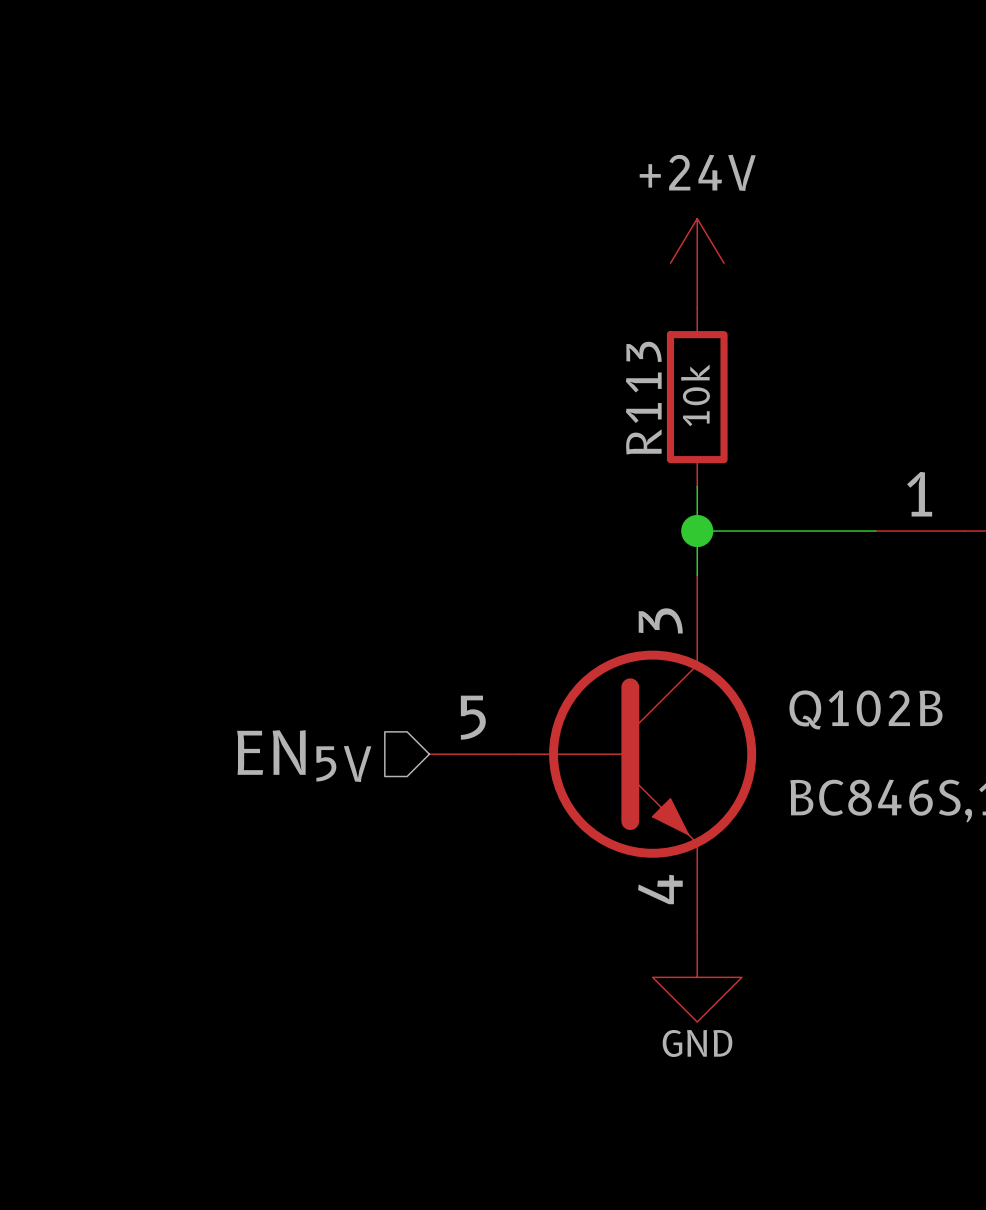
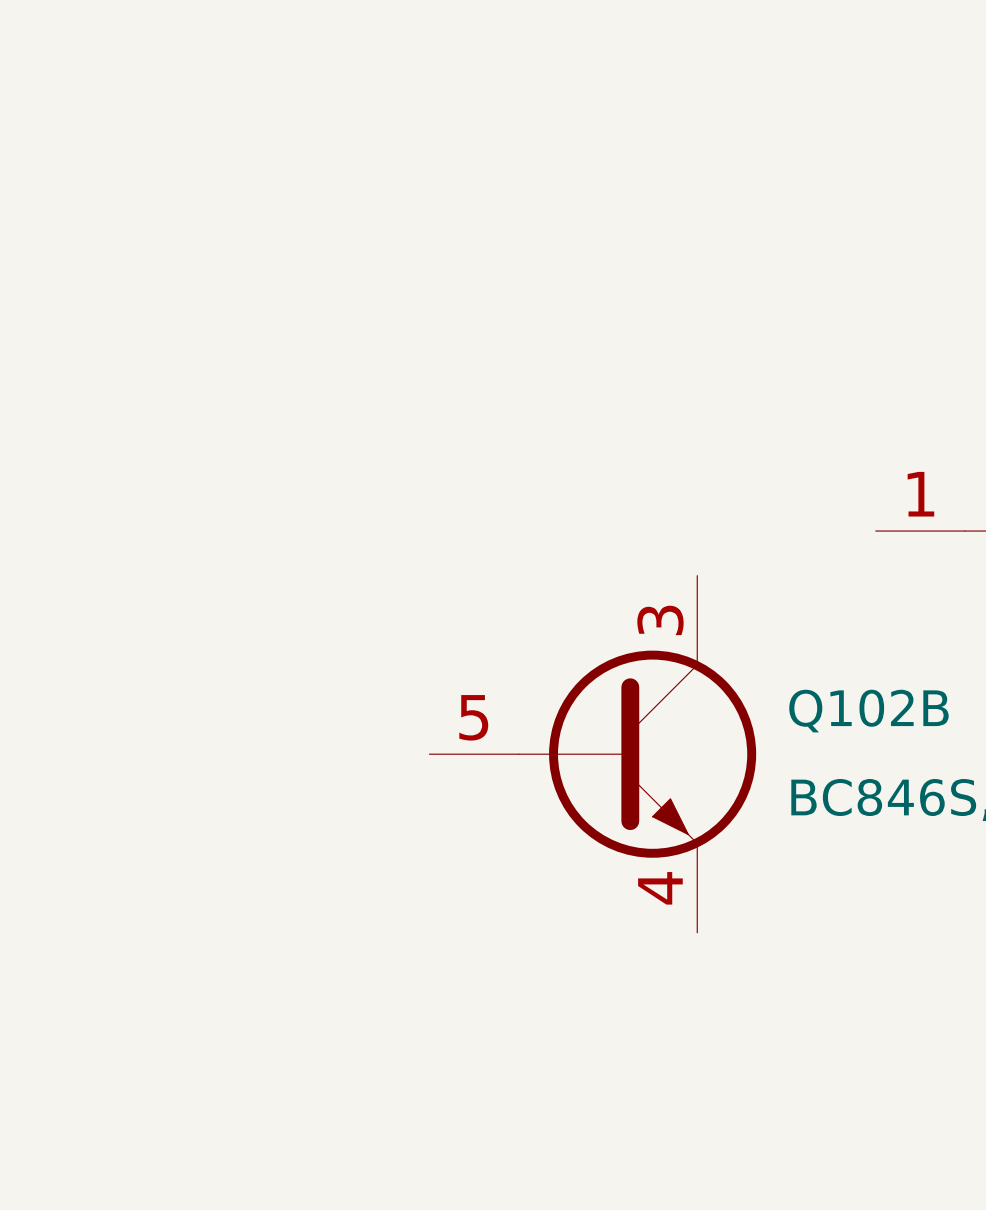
power symbol: +24V (697, 263) -> none
R113: 10k (697, 397) -> none
wire: (697, 486) (697, 575) -> none
wire: (697, 531) (875, 531) -> none
junction: (697, 531) -> none
hierarchical label: EN5V (304, 756) -> none
power symbol: GND (697, 977) -> none

